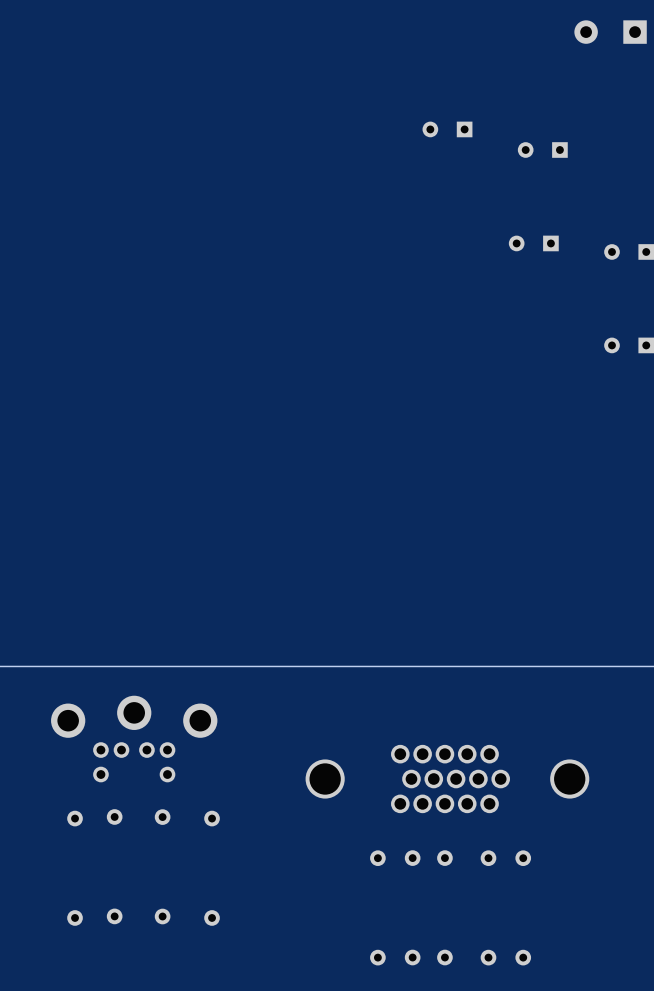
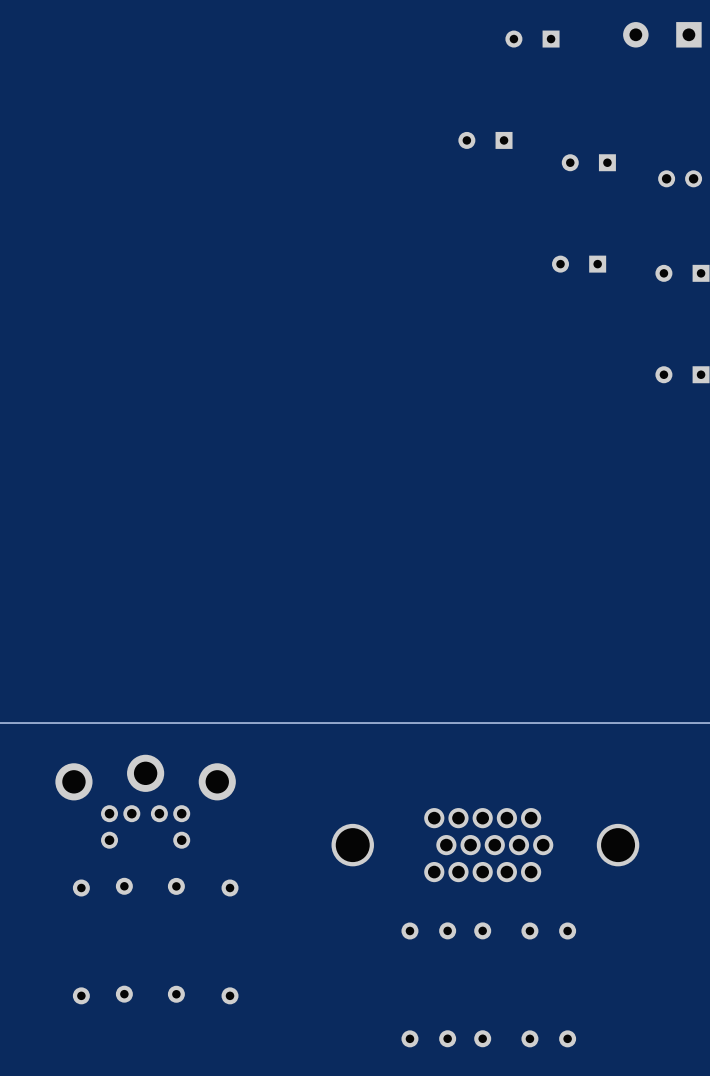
part: none -> (532, 39)
part: none -> (680, 178)

